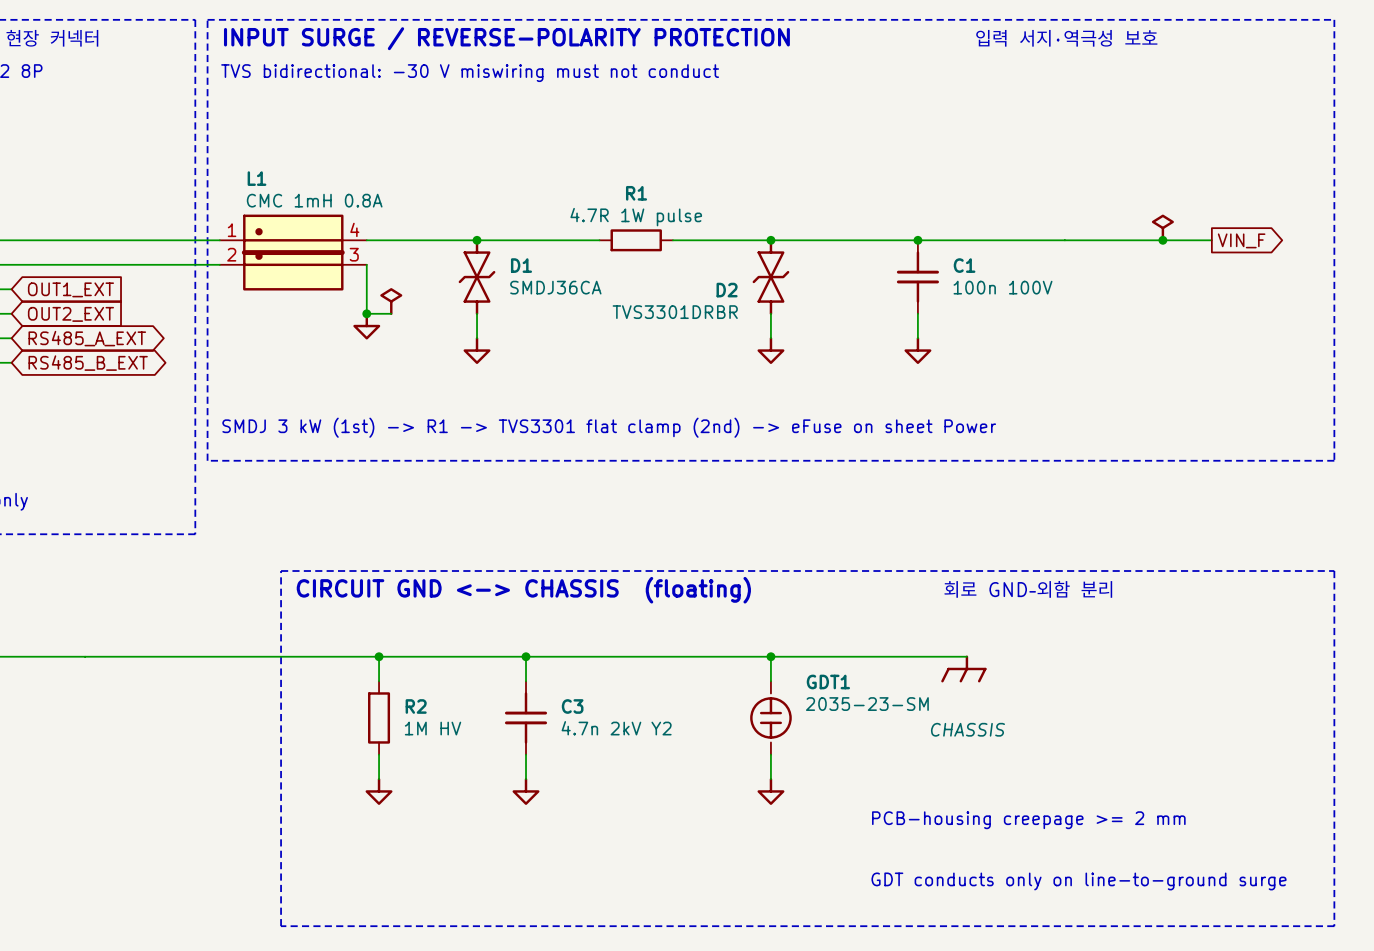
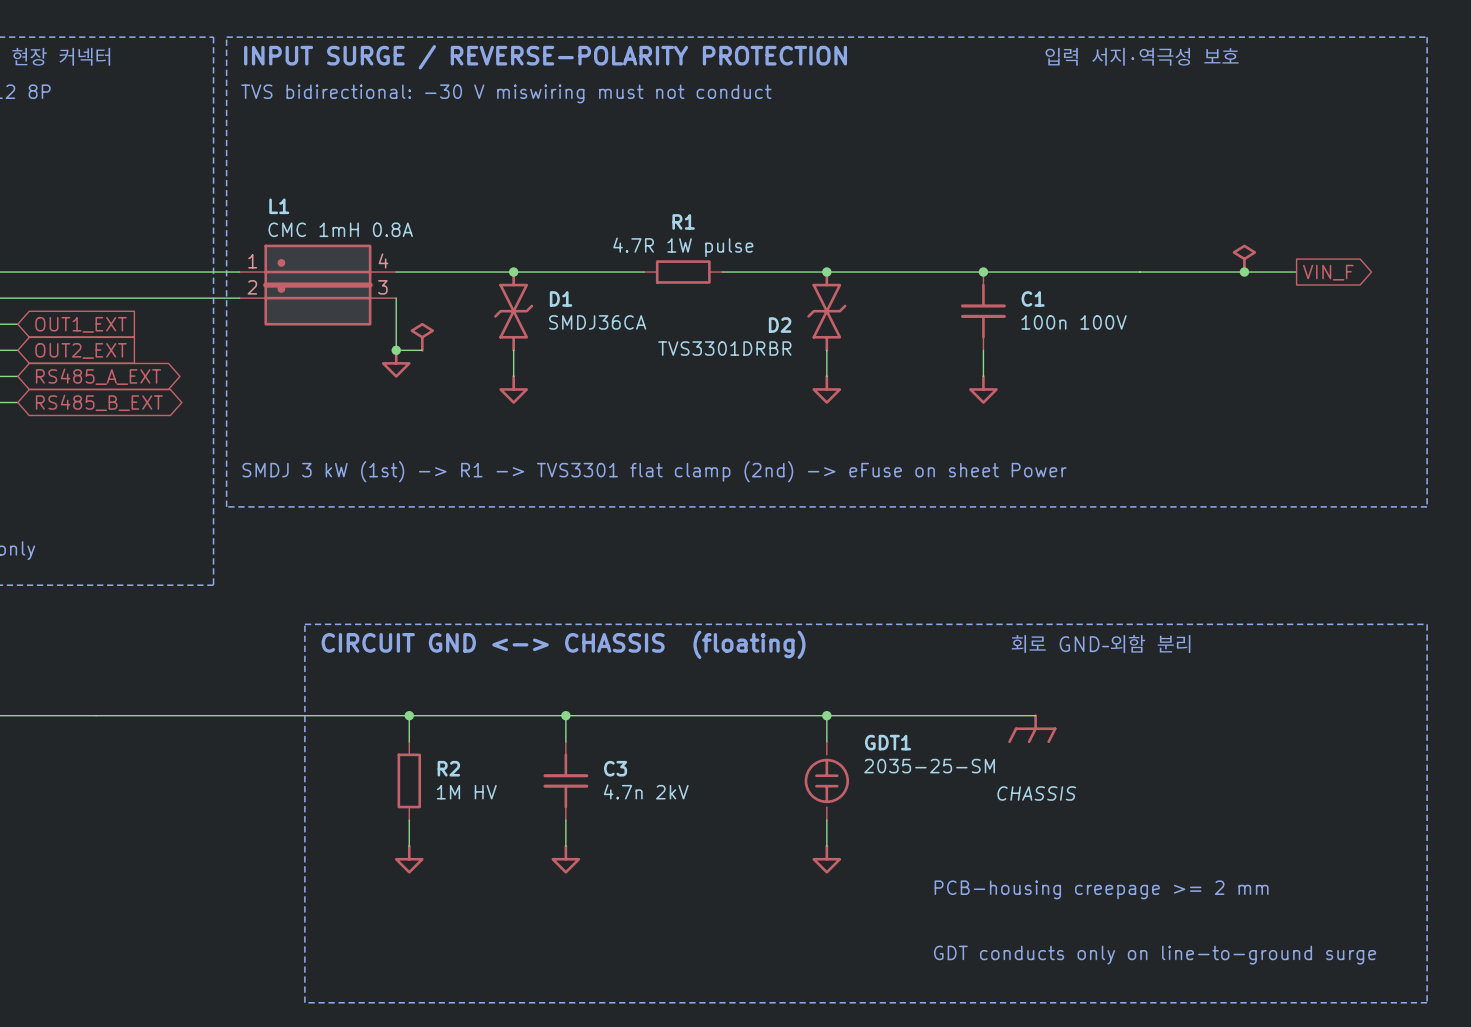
GDT1 value: 2035-23-SM (867, 704) -> 2035-25-SM (929, 766)
C3 value: 4.7n 2kV Y2 (616, 728) -> 4.7n 2kV (646, 791)

